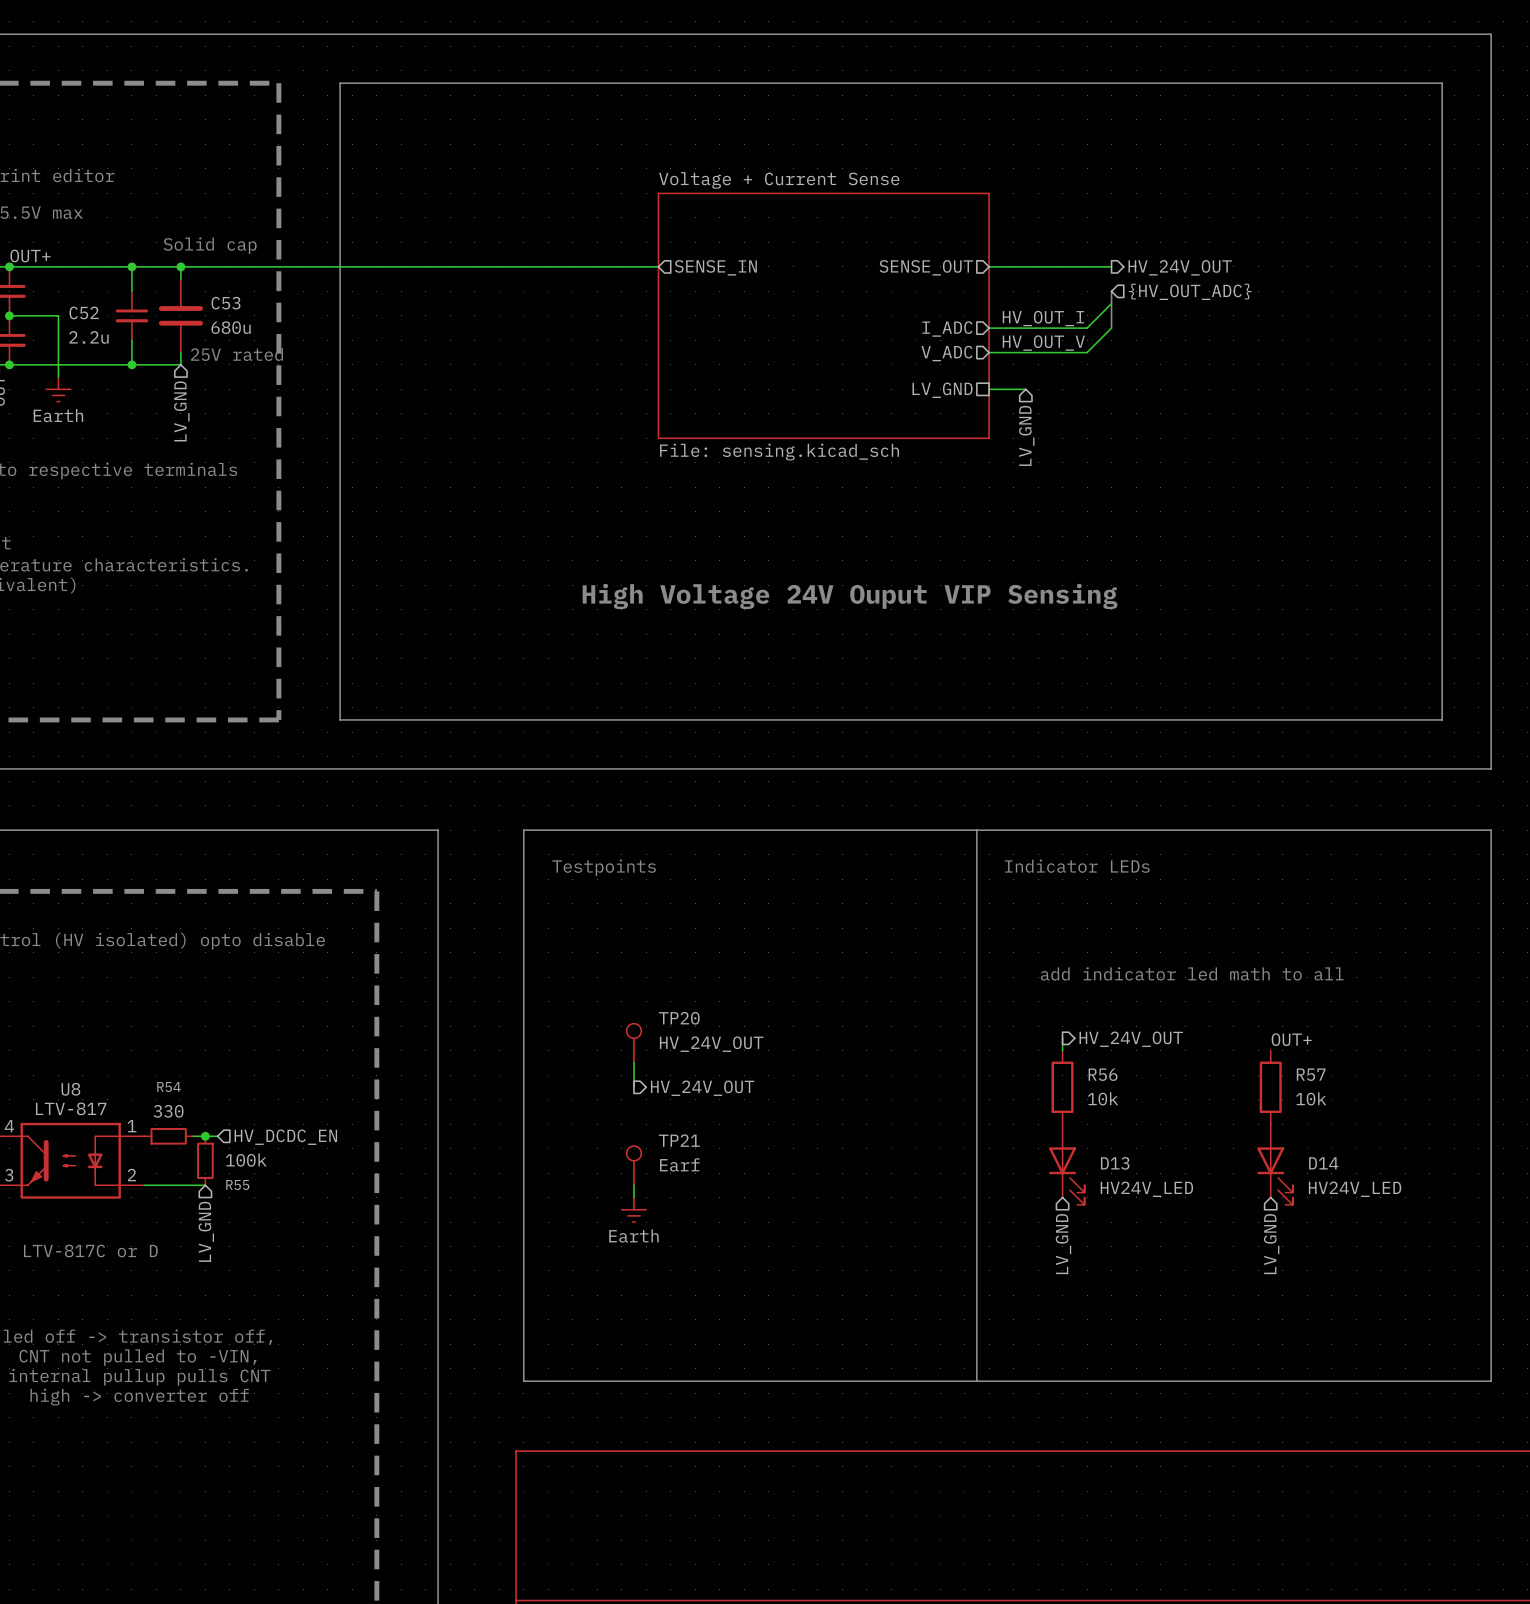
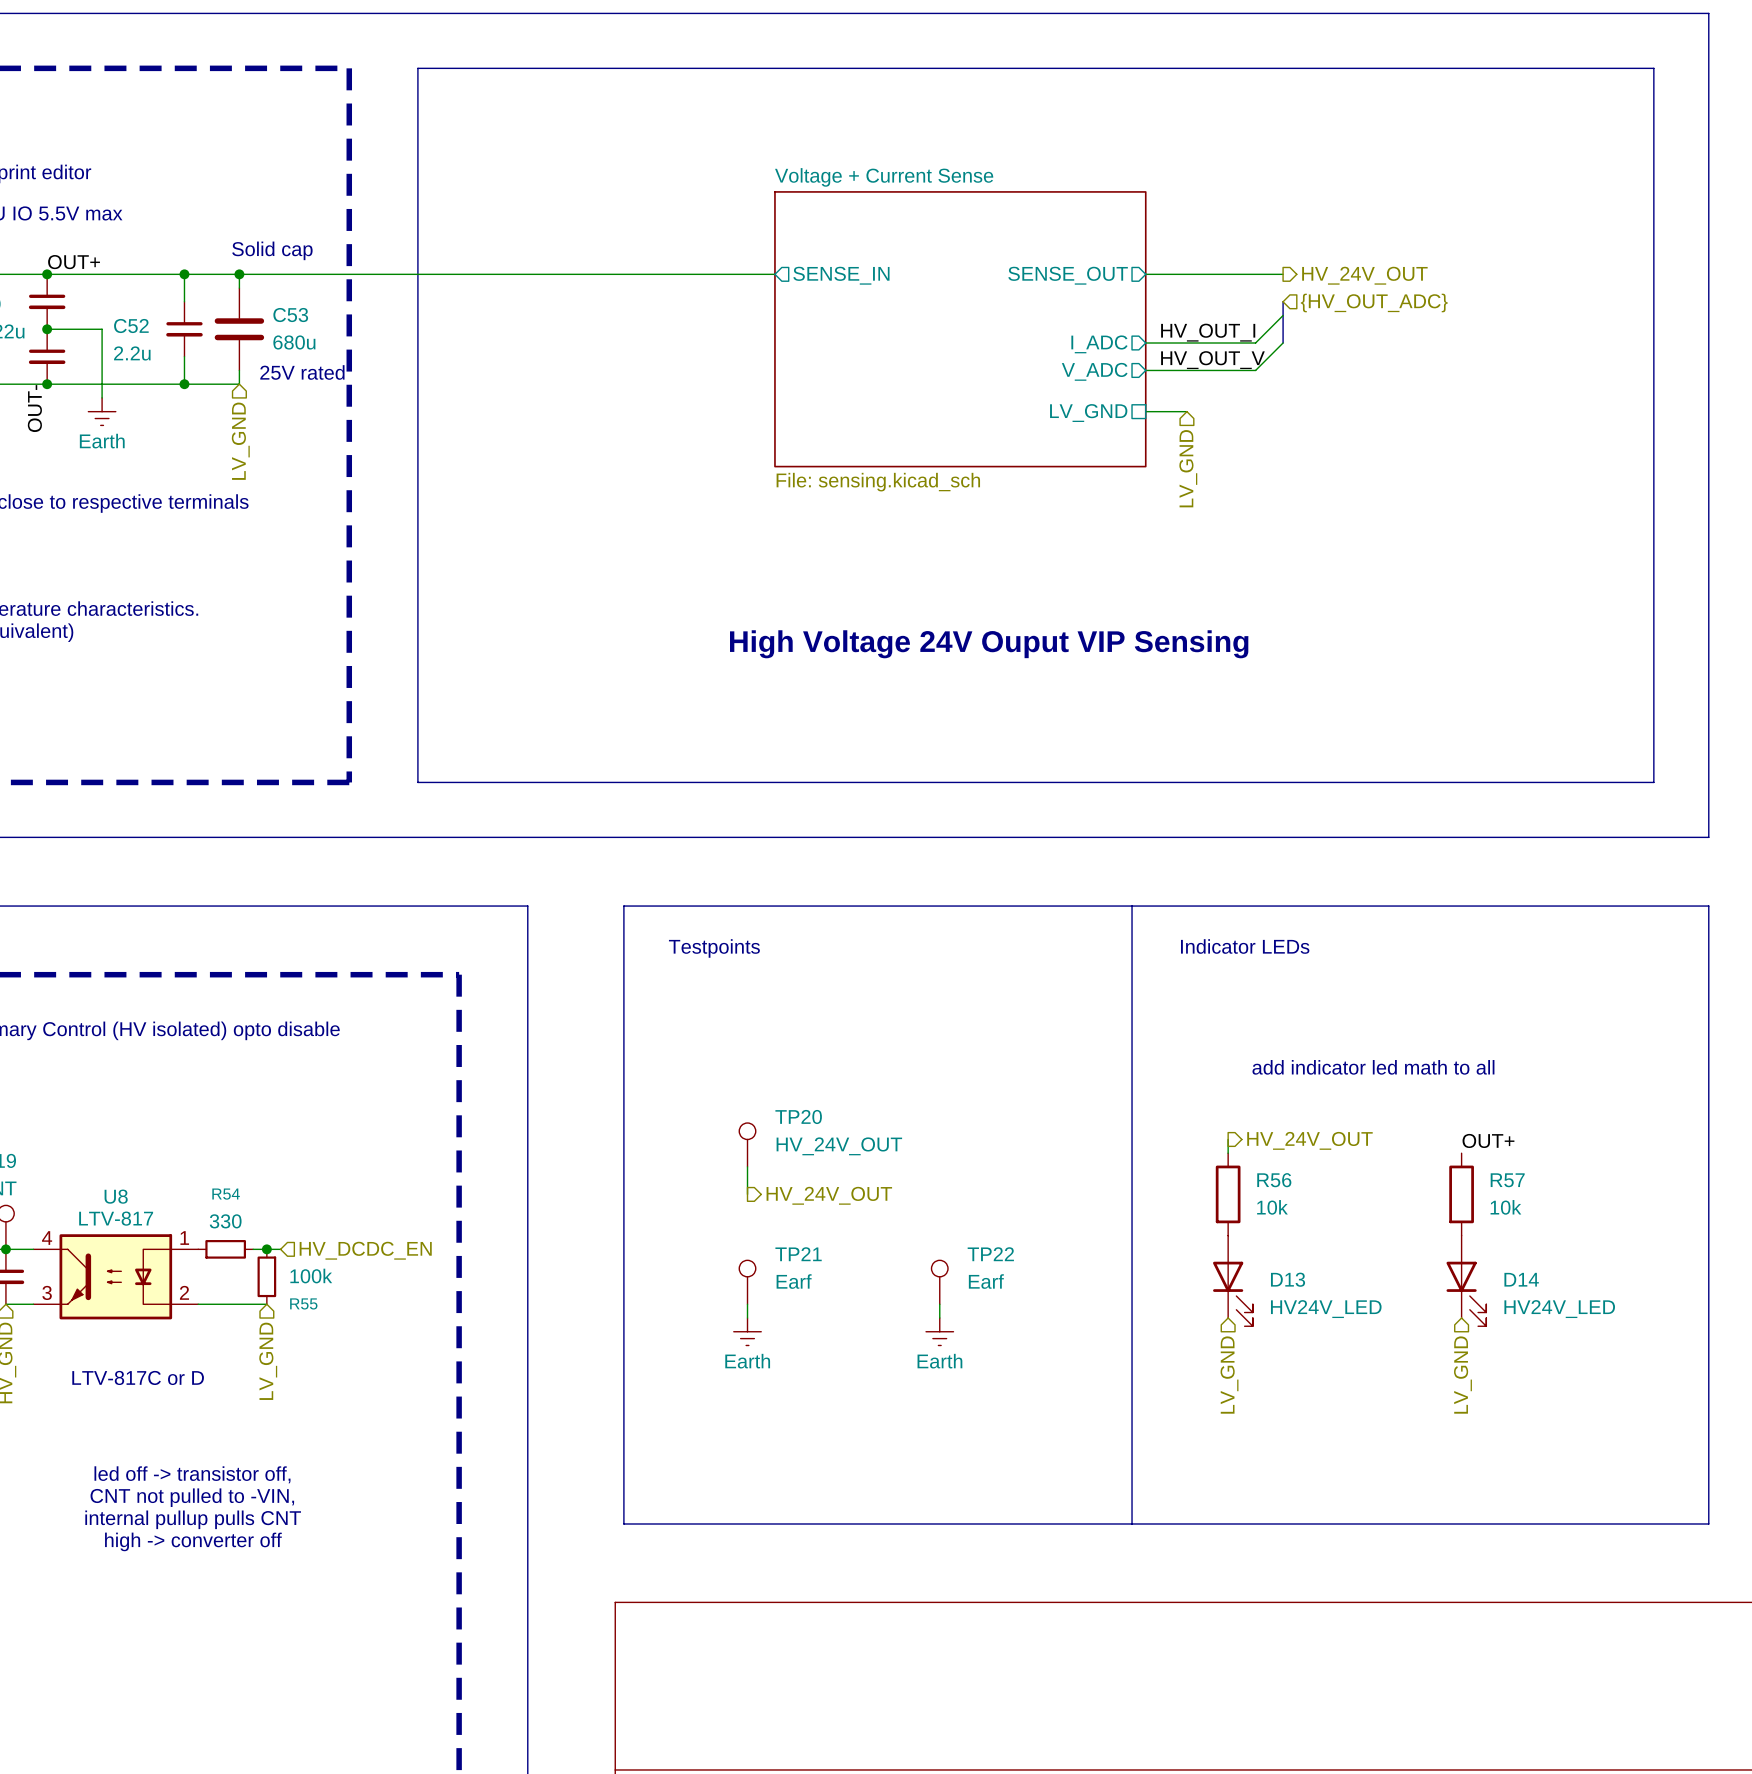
TP22: none -> Earf (939, 1282)
wire: none -> (939, 1304) (939, 1318)
power symbol: none -> Earth (939, 1331)

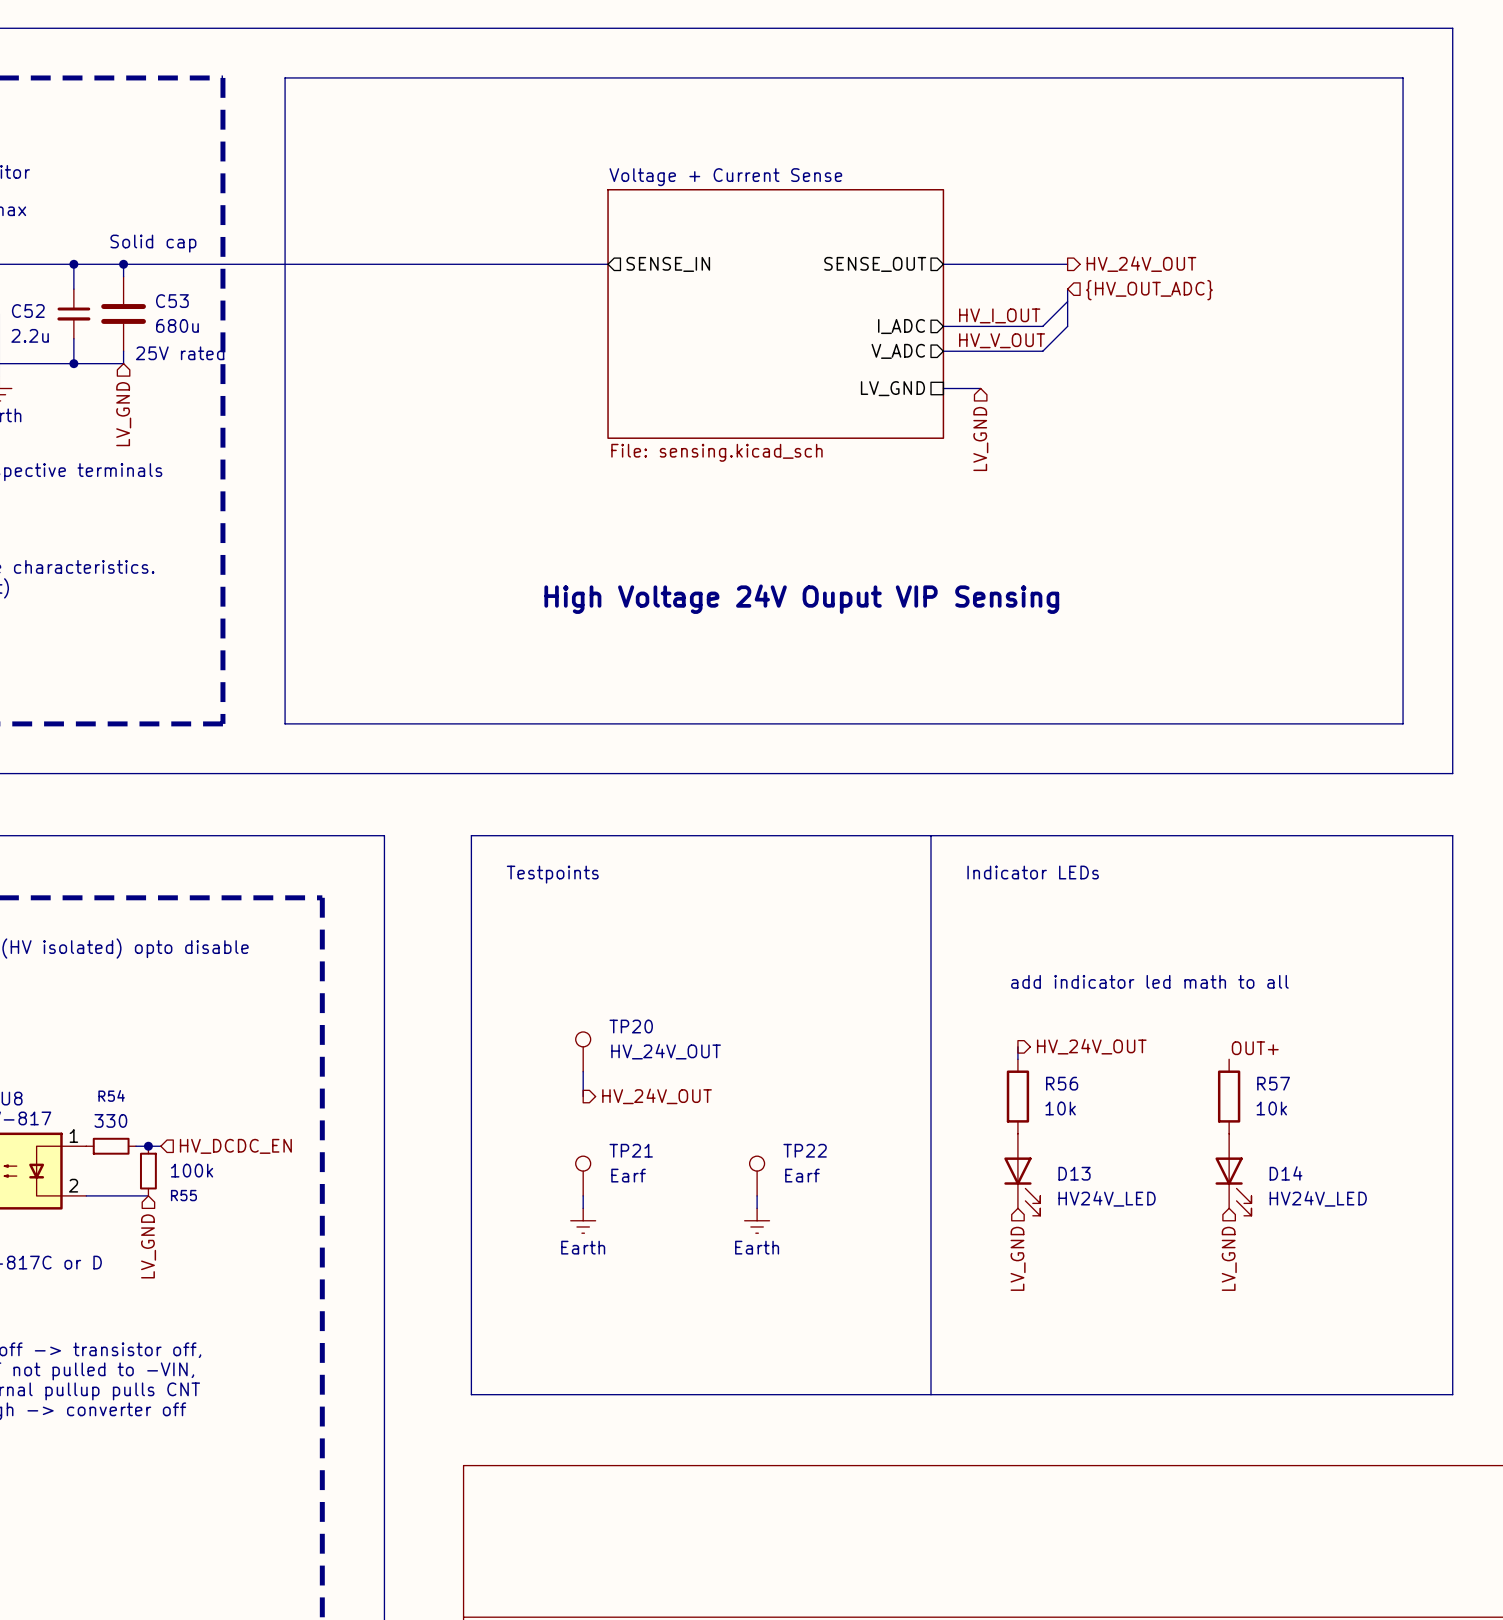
label: HV_OUT_I (1208, 332) -> HV_I_OUT (999, 315)
label: HV_OUT_V (1212, 360) -> HV_V_OUT (1002, 340)

